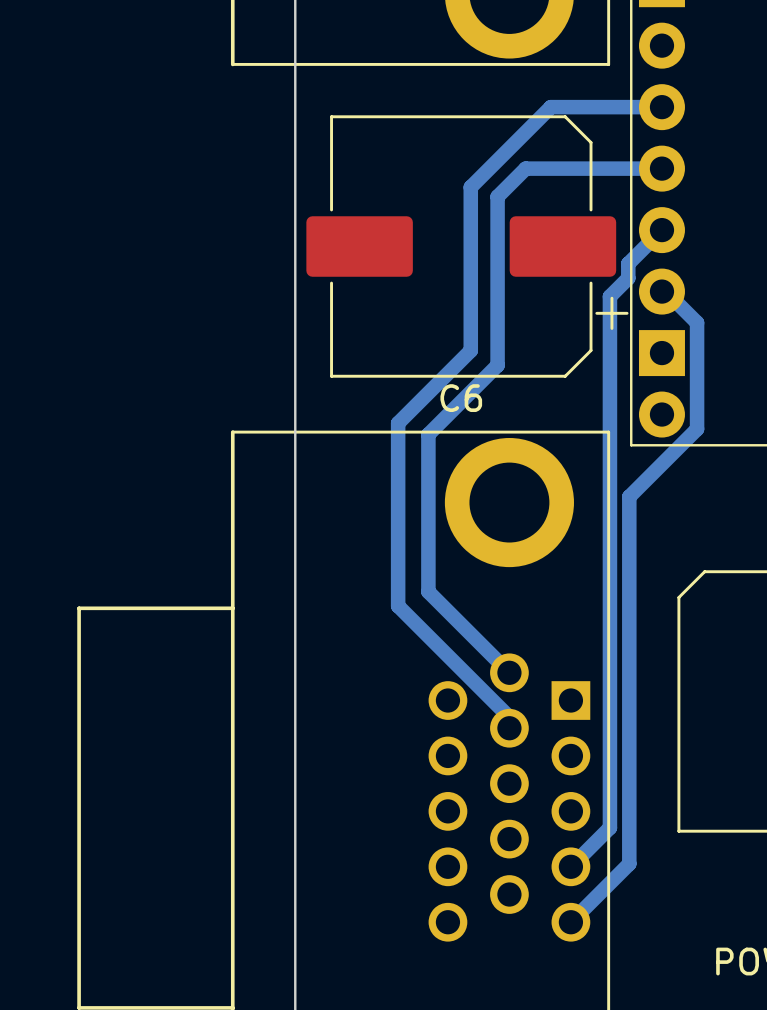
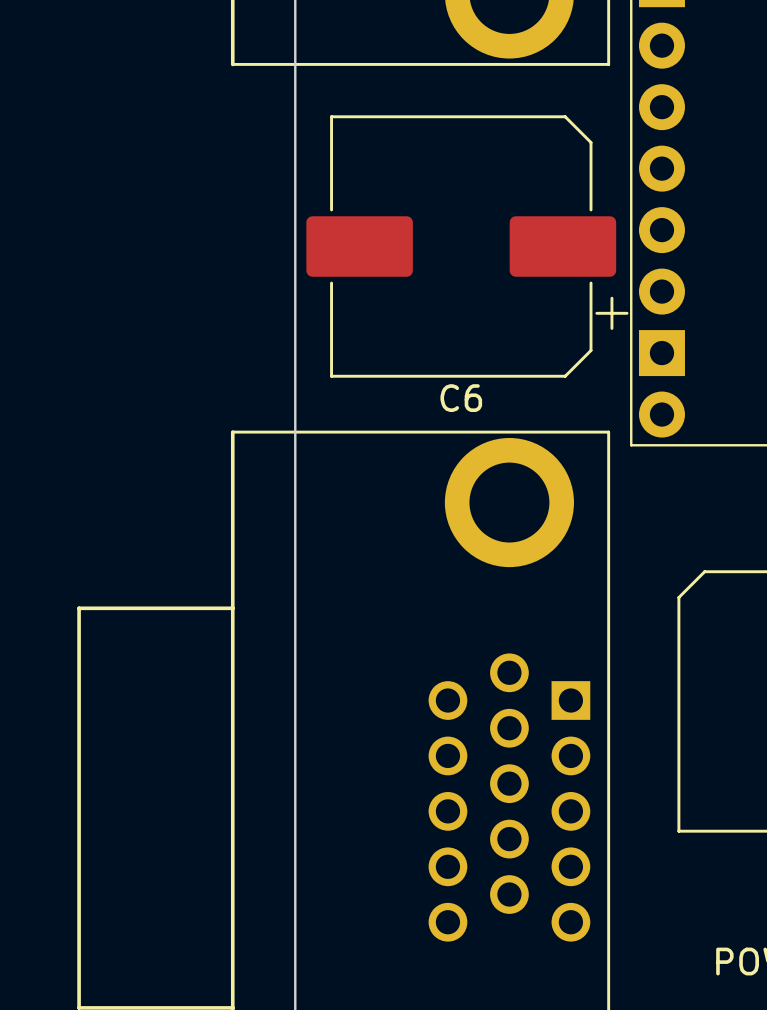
bottom track: (661, 107) (550, 107) (470, 187) (470, 350) (398, 423) (398, 606) (509, 717) (509, 728) -> none
bottom track: (661, 168) (525, 168) (497, 196) (497, 365) (428, 434) (428, 591) (509, 672) -> none
bottom track: (661, 230) (628, 263) (628, 278) (609, 296) (609, 827) (570, 866) -> none
bottom track: (661, 291) (665, 291) (697, 322) (697, 429) (629, 496) (629, 863) (570, 922) -> none

